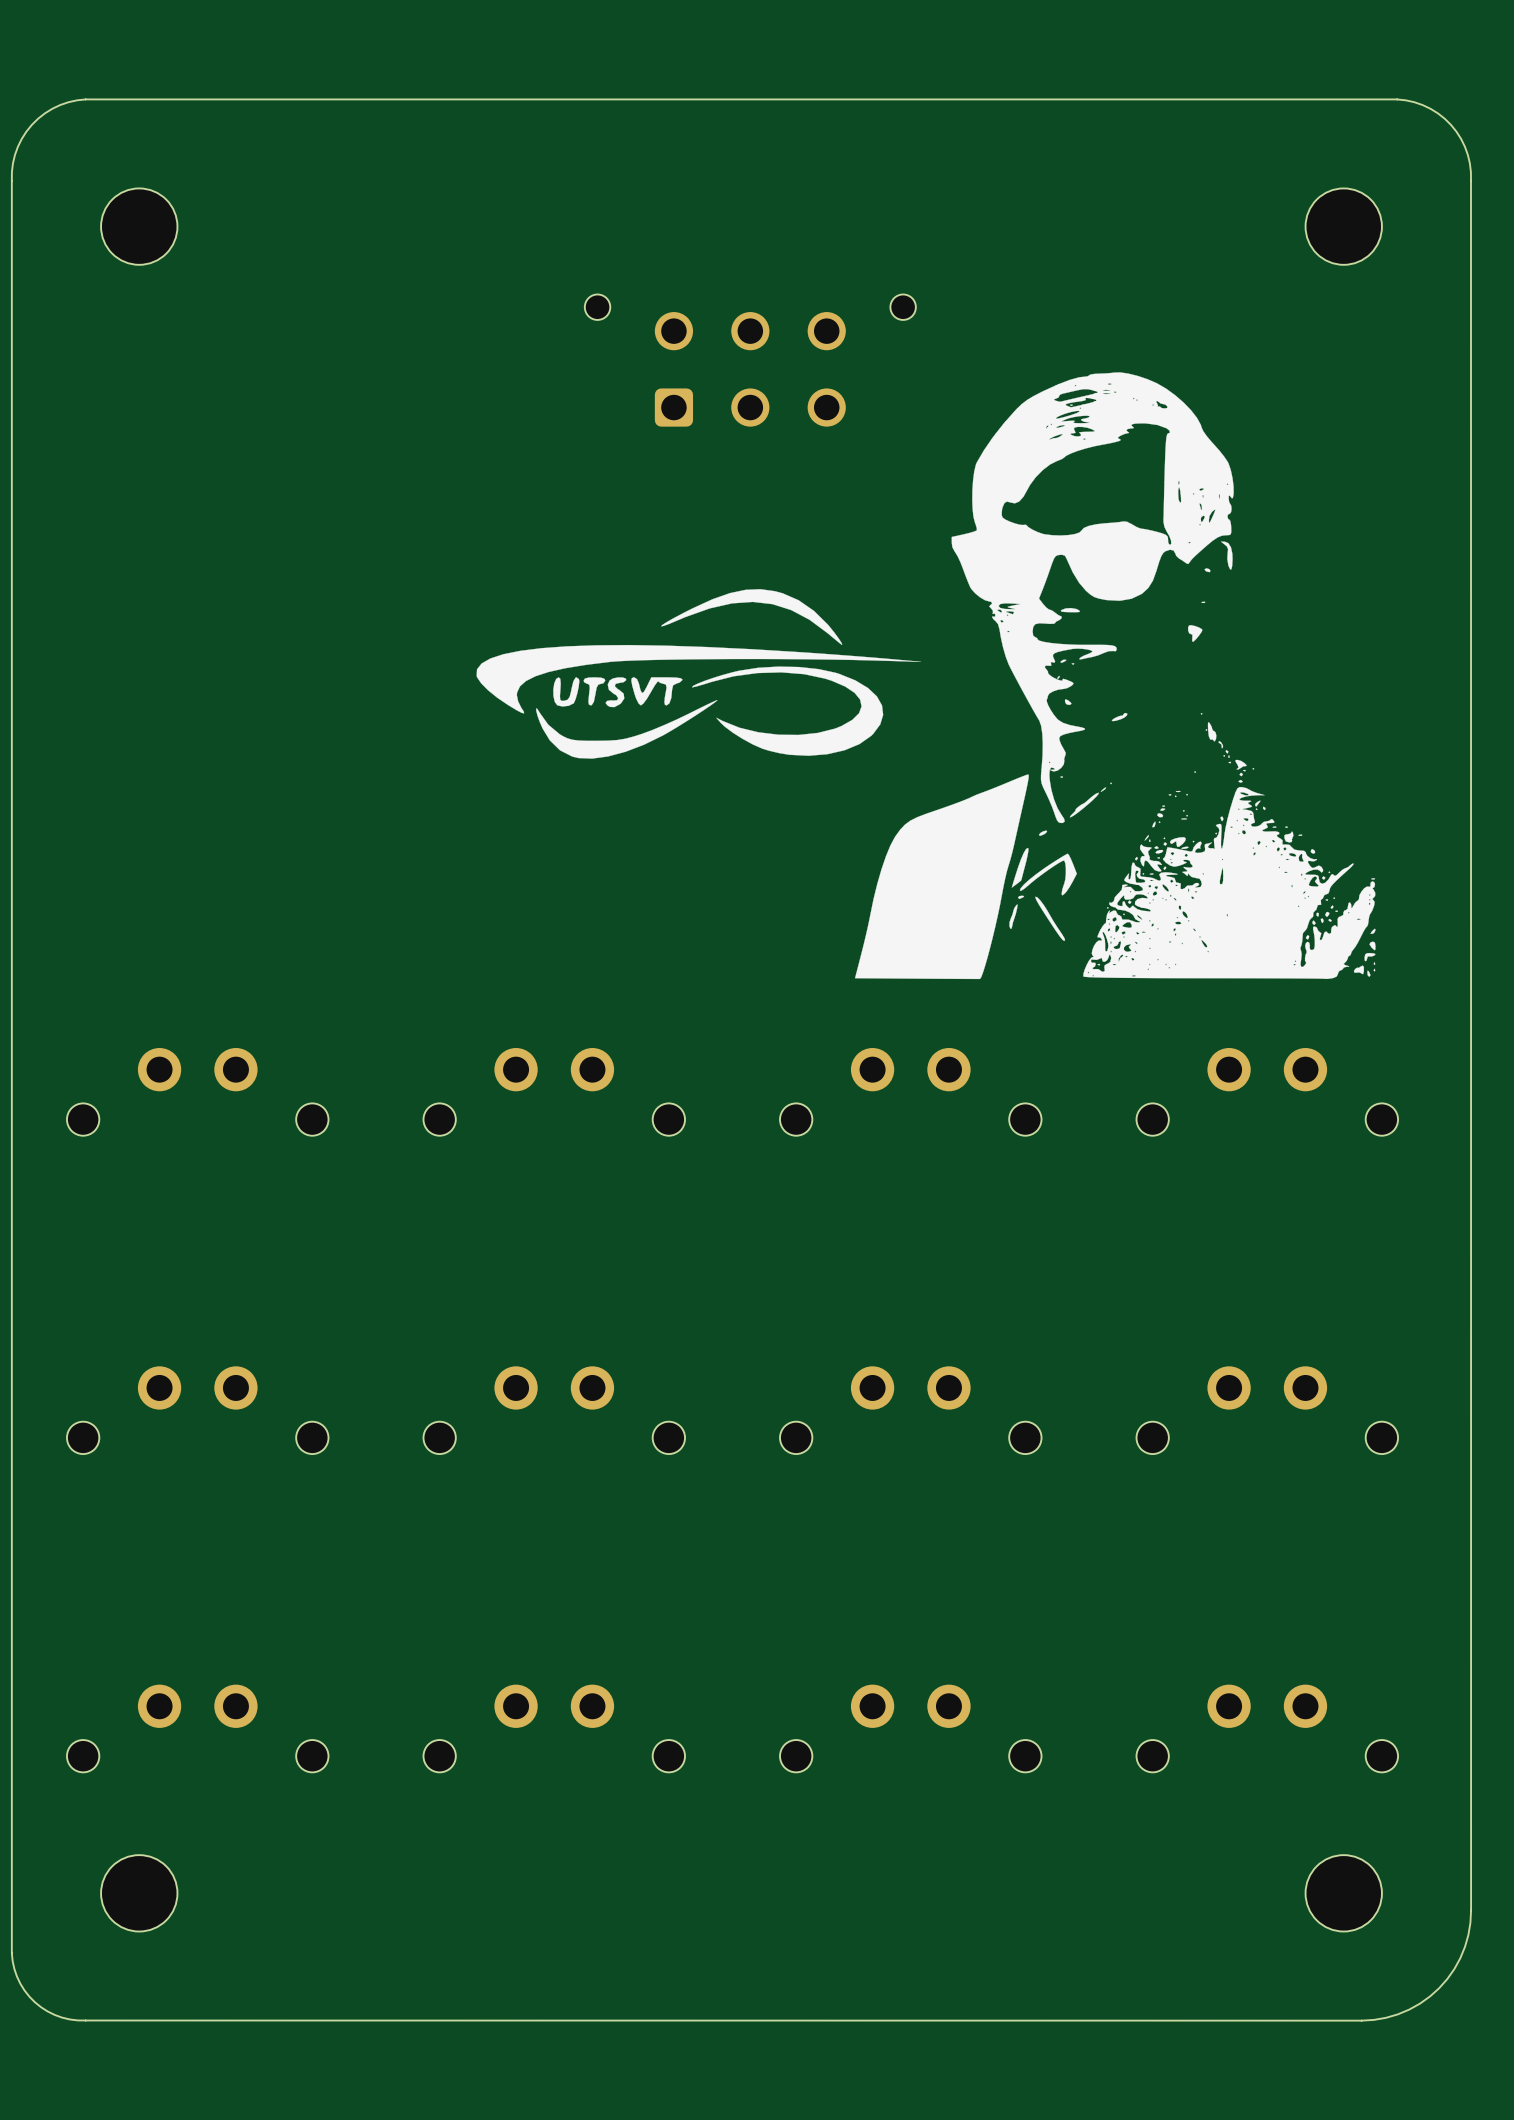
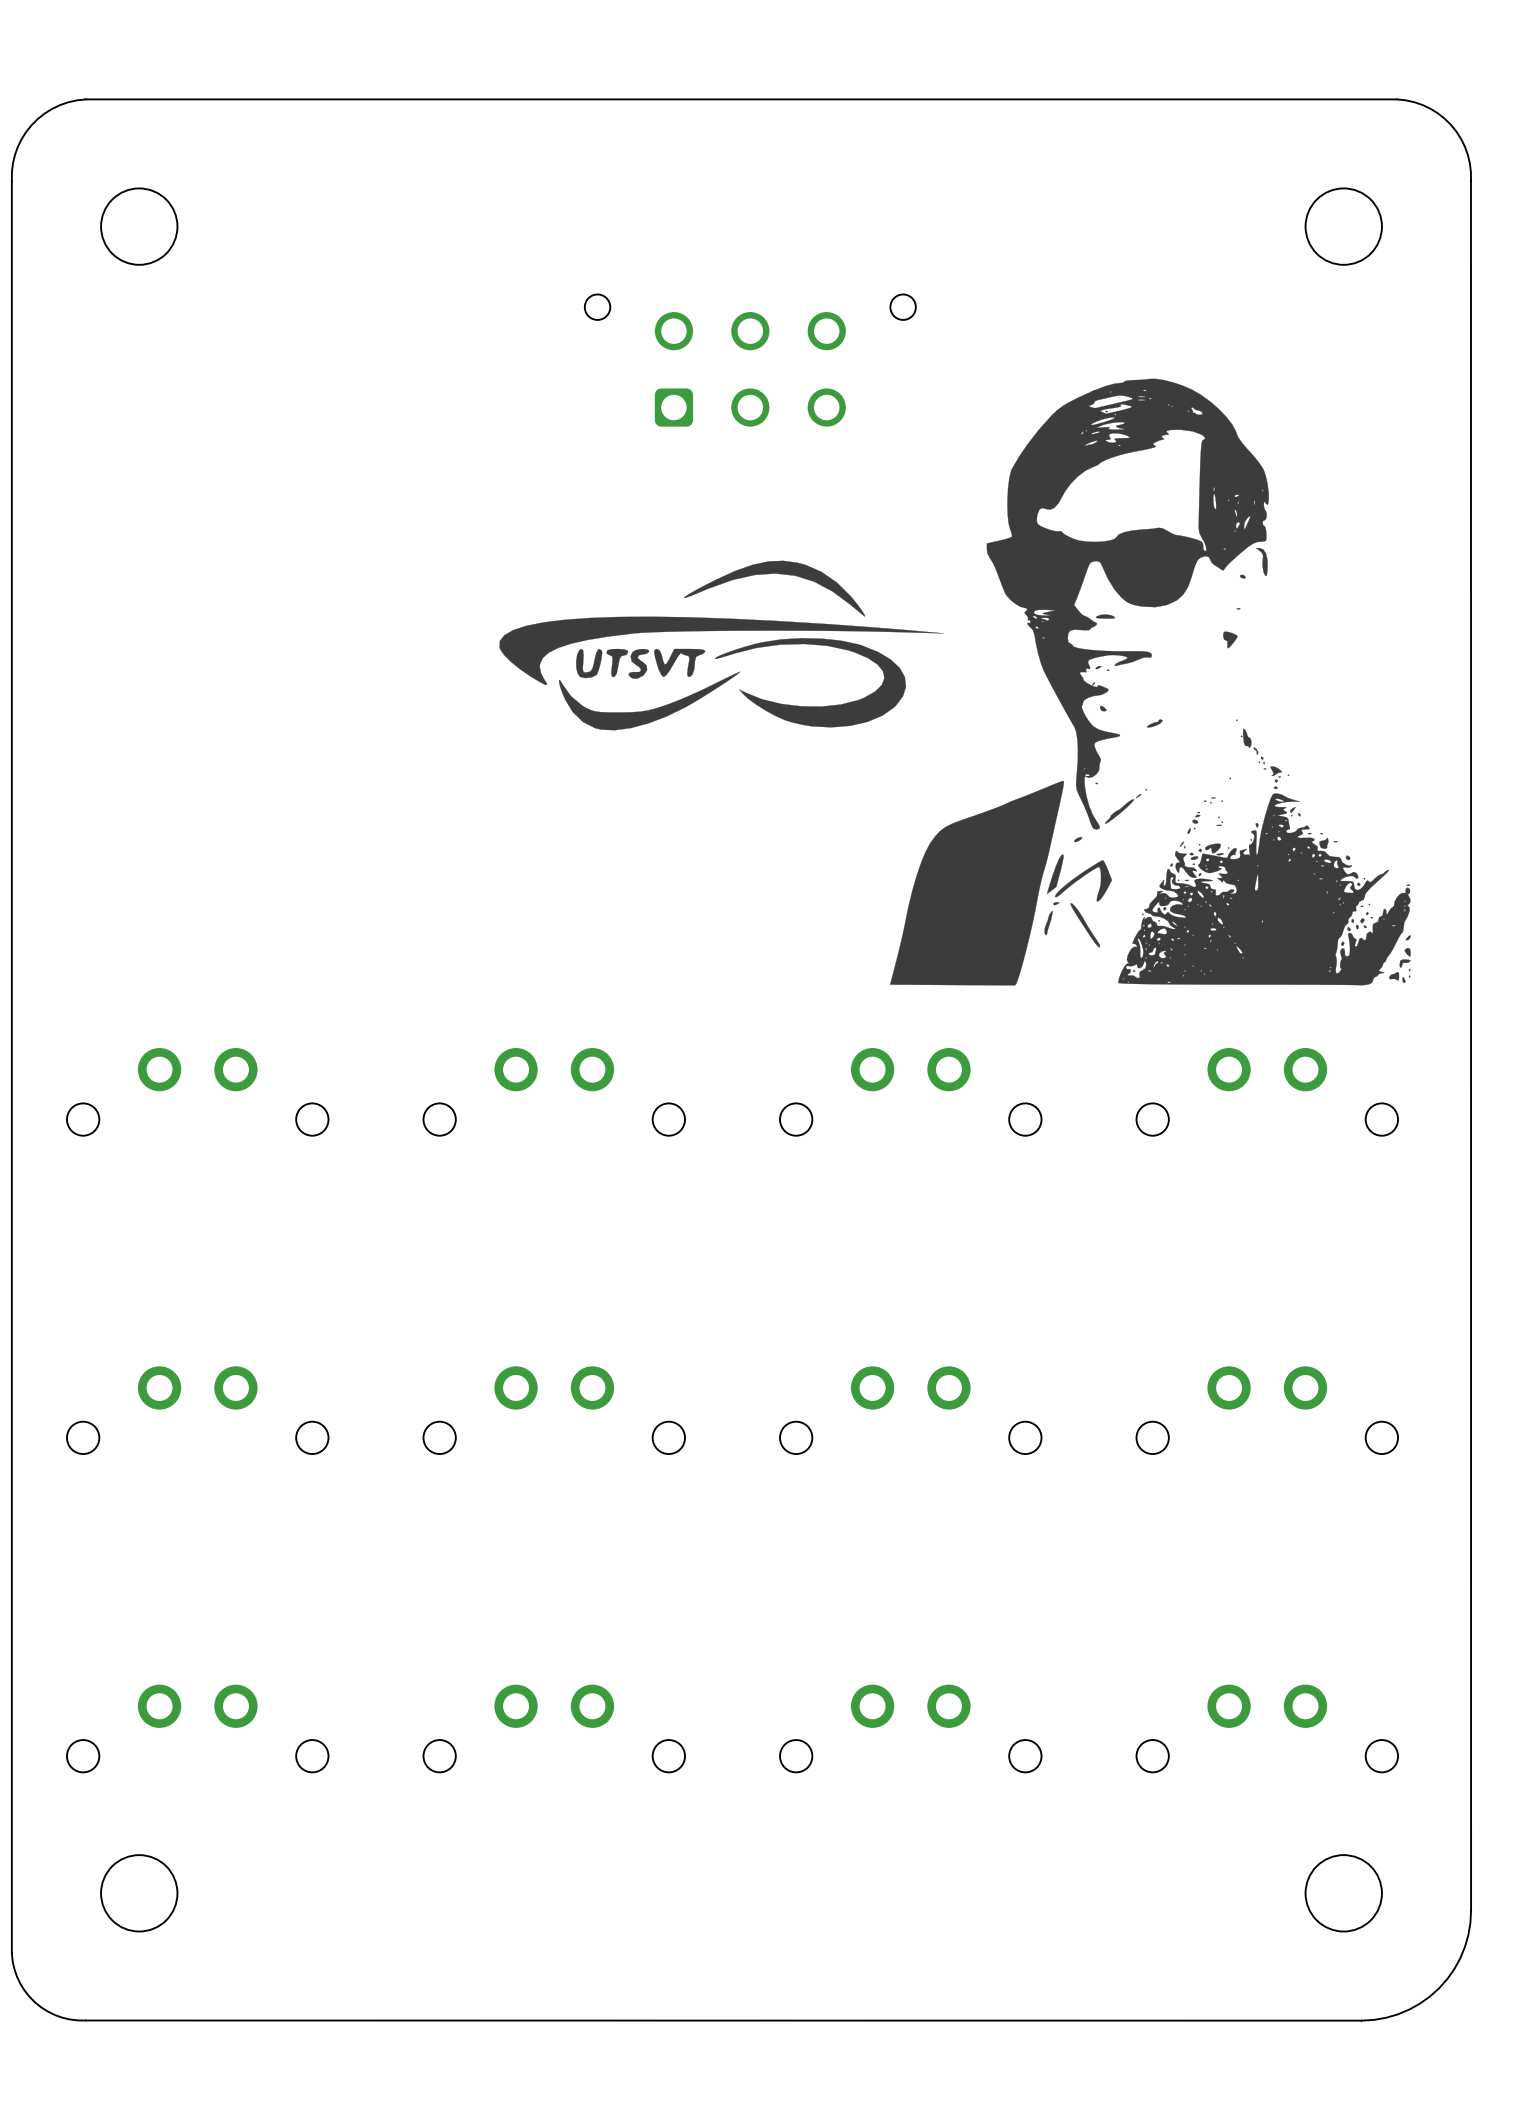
drawing position: (698, 673) -> (721, 645)
drawing position: (1115, 675) -> (1150, 682)

